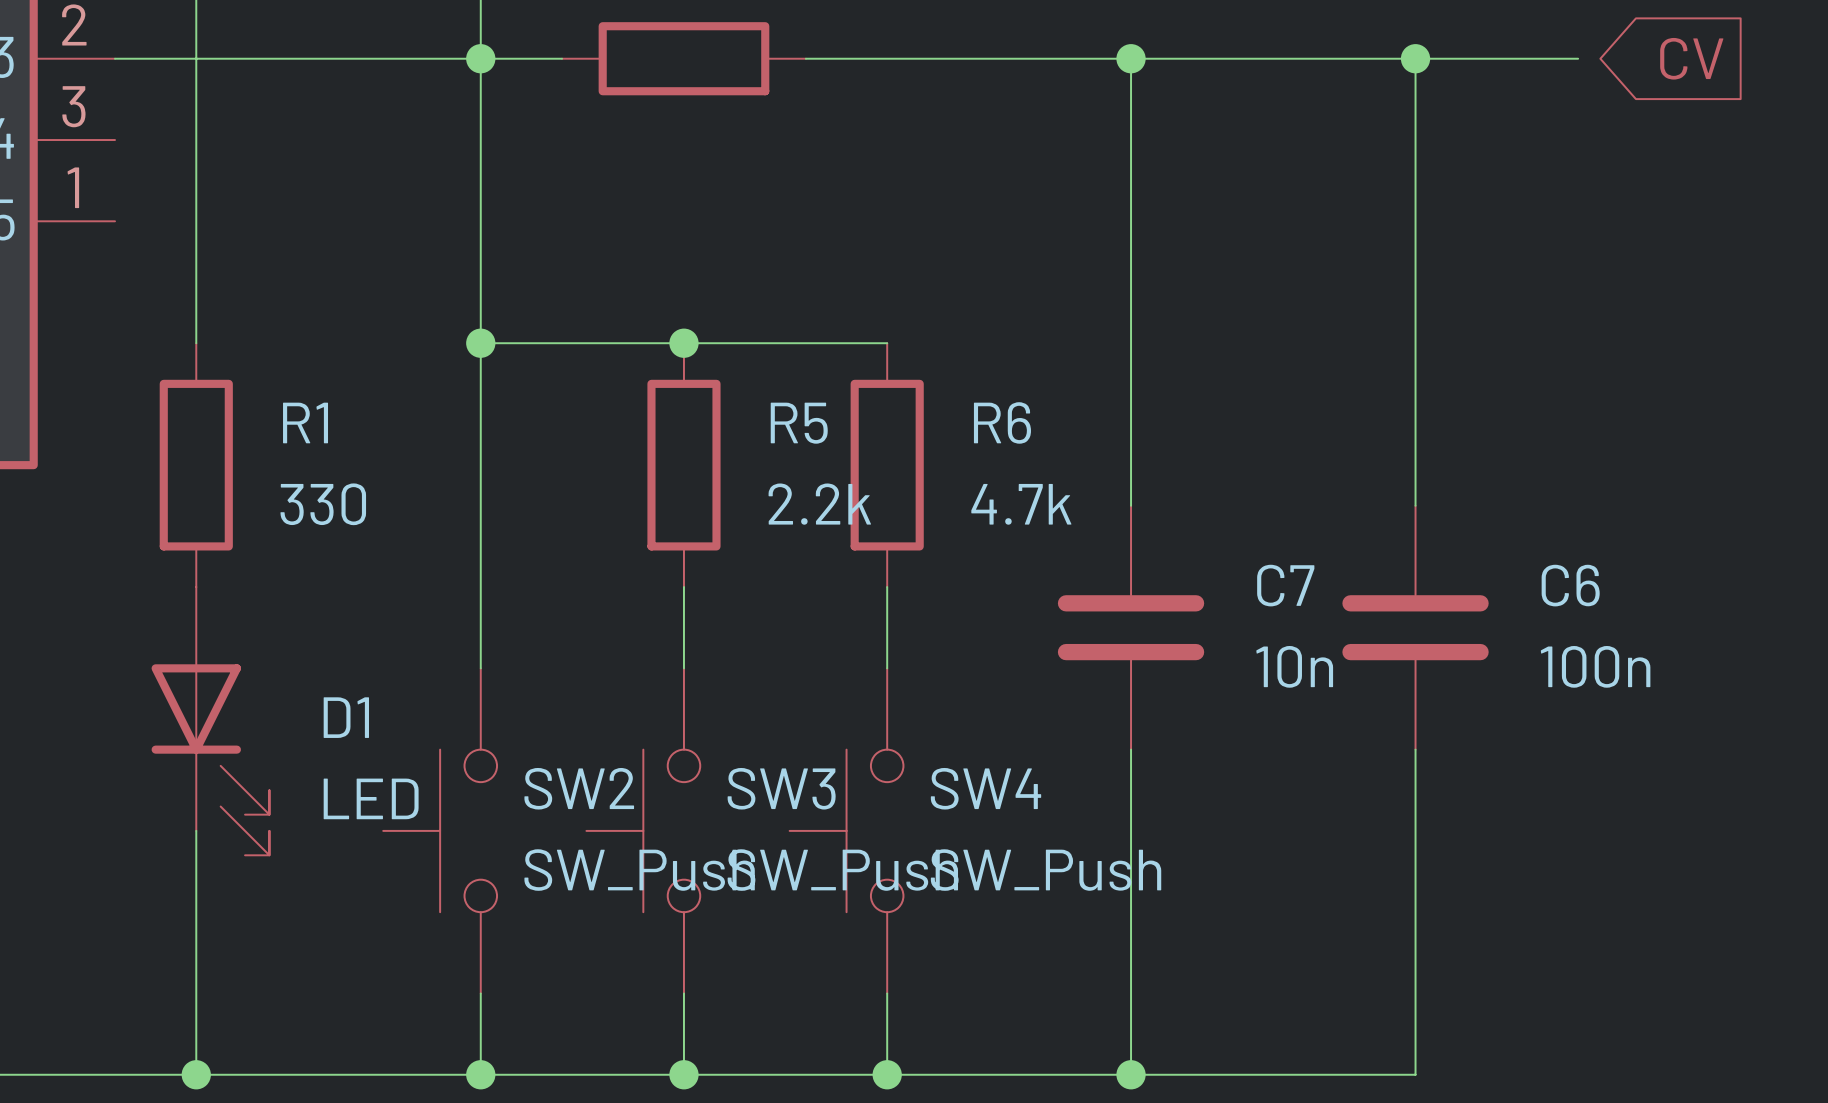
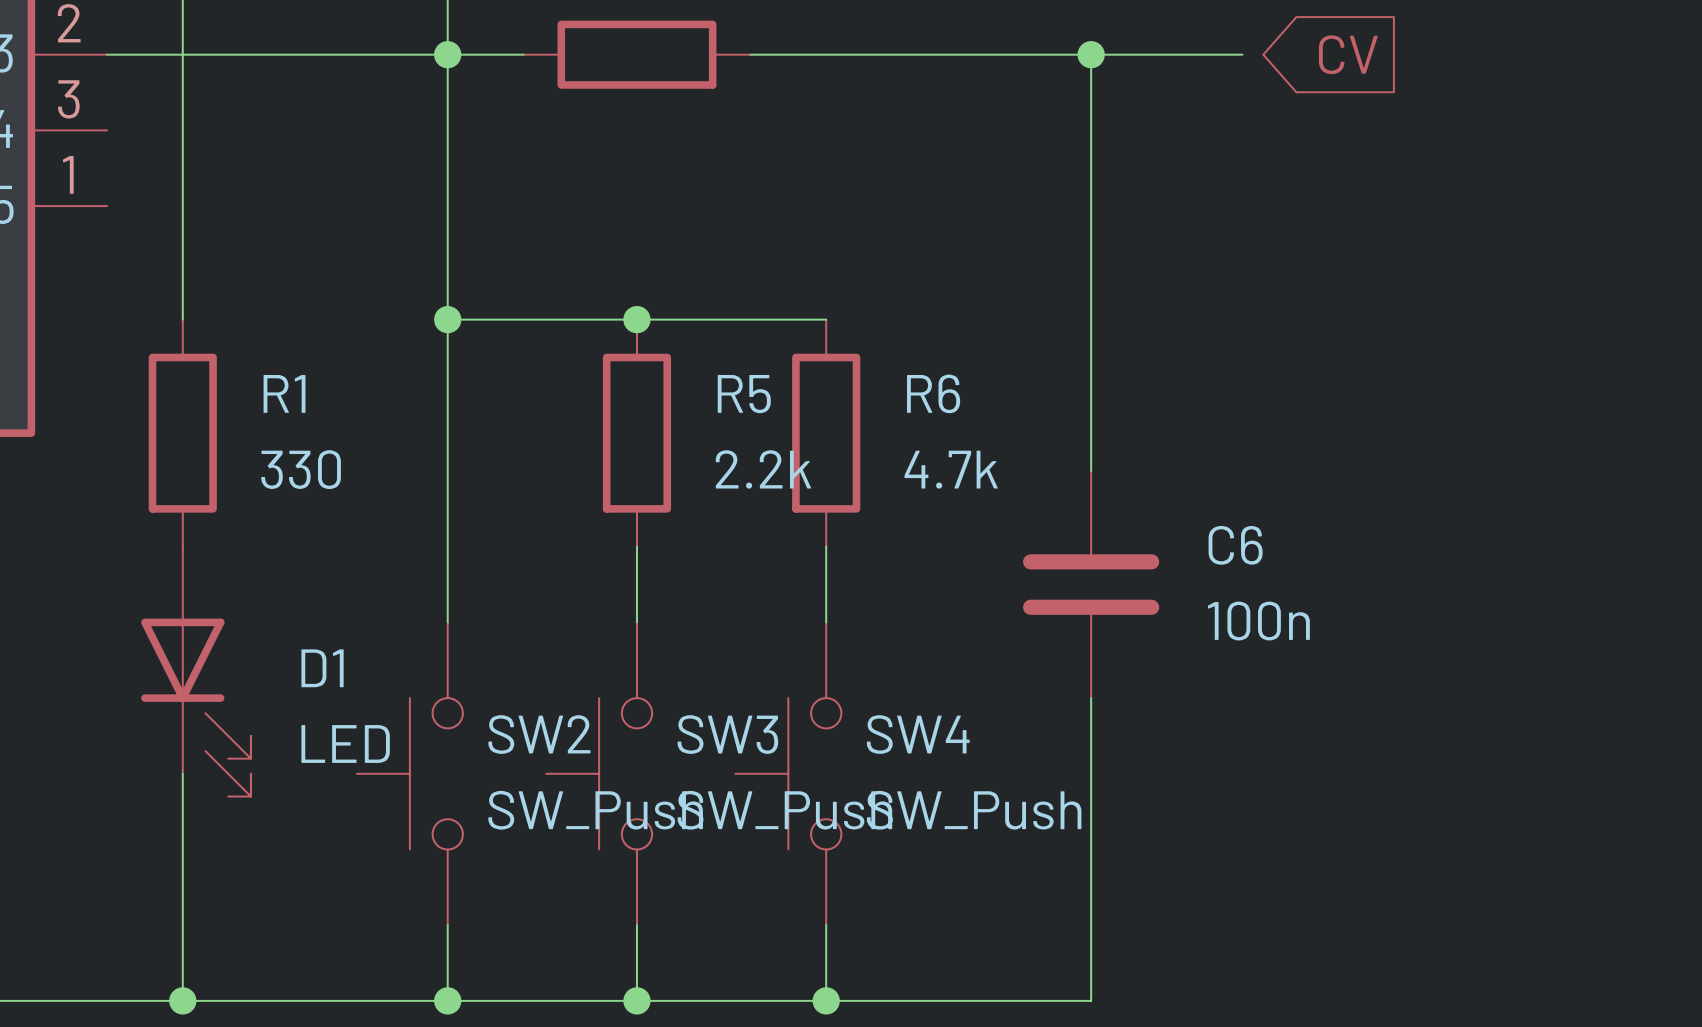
wire: (1131, 58) (1131, 505) -> (1091, 54) (1091, 471)
junction position: (1131, 58) -> (1091, 54)
wire: (1334, 58) (1578, 58) -> none
wire: (1415, 58) (1415, 505) -> none
junction: (1415, 58) -> none
global label position: CV (1691, 58) -> CV (1348, 54)
C7: 10n (1131, 627) -> none
C6 position: (1415, 627) -> (1091, 584)
wire: (1131, 749) (1131, 1074) -> none
wire: (1415, 749) (1415, 1074) (1171, 1074) -> (1091, 698) (1091, 1000)
junction: (1131, 1074) -> none

